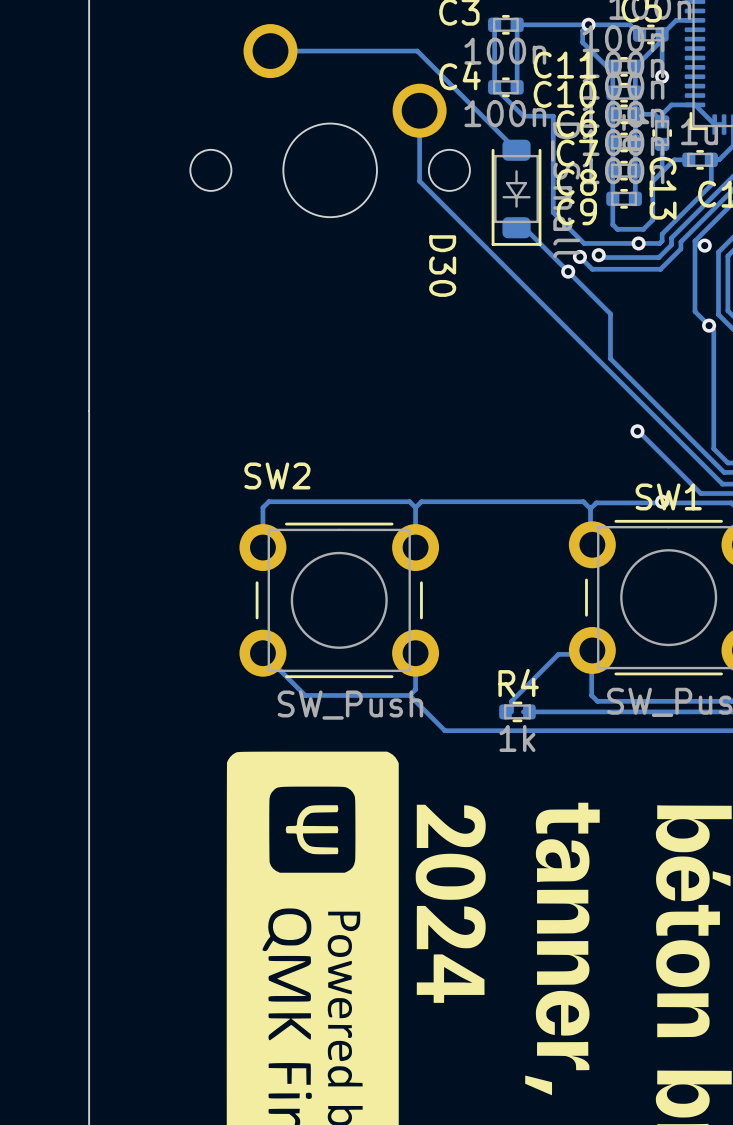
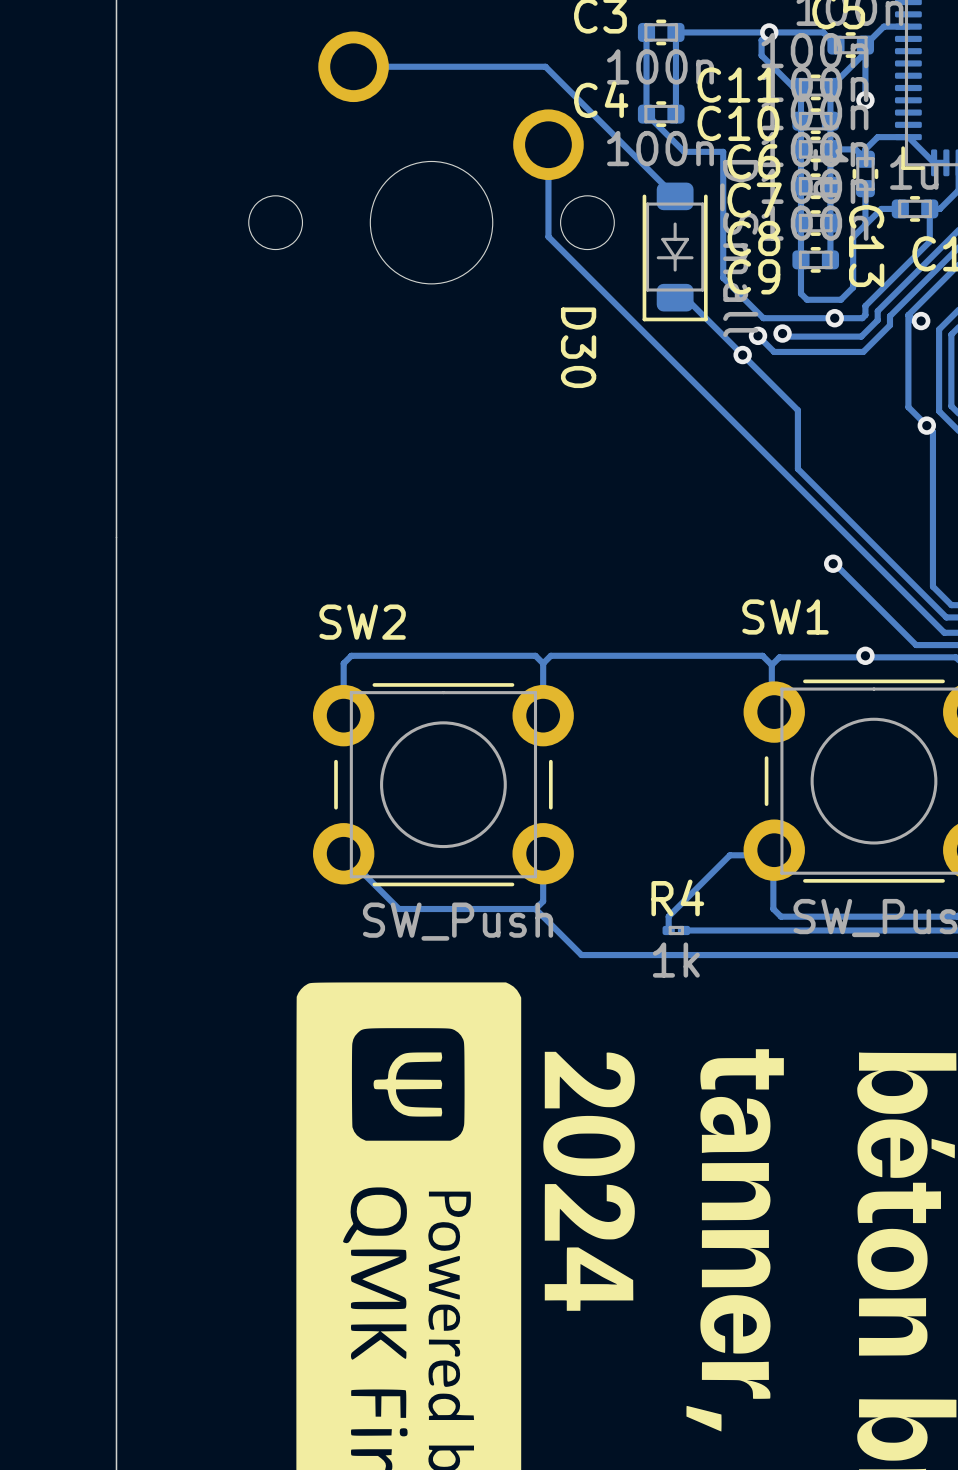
SW1 name position: SW1 (668, 496) -> SW1 (785, 617)
R4 footprint: [499, 701, 536, 723] -> [662, 925, 691, 936]

